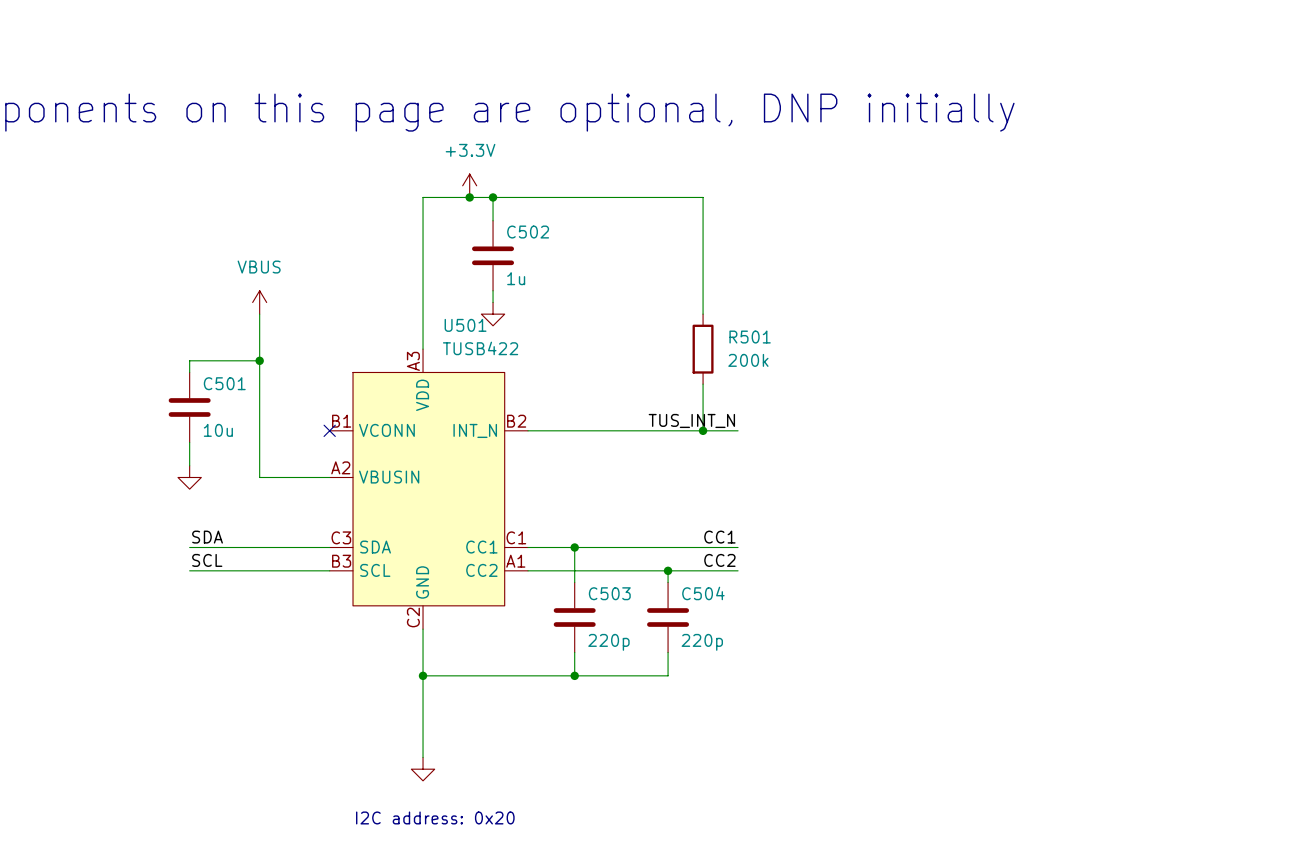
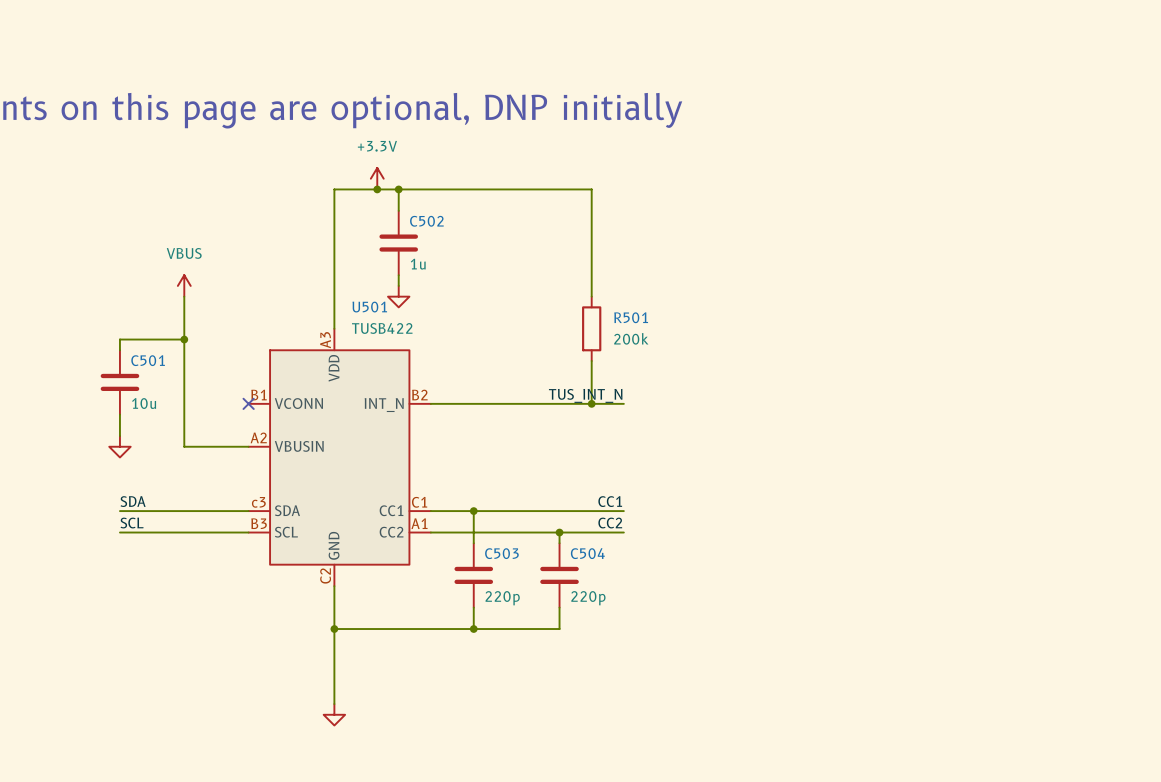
U501 pin number: C3 (341, 537) -> c3 (258, 502)
text: I2C address: 0x20 (435, 817) -> none

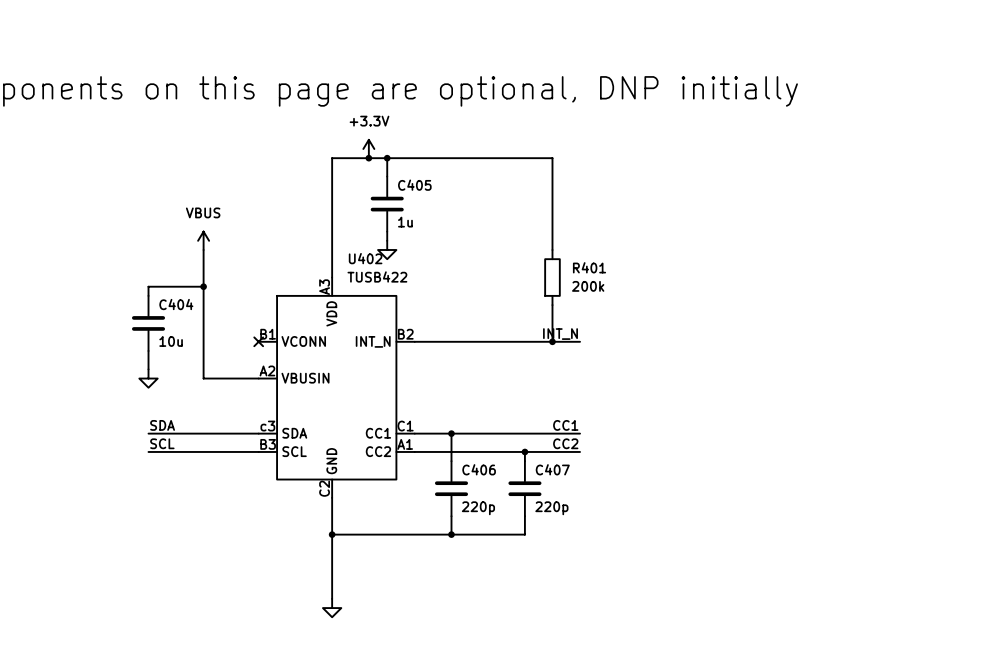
C502 name: C502 (426, 221) -> C405 (414, 185)
U501 name: U501 (369, 307) -> U402 (365, 258)
R501 name: R501 (631, 317) -> R401 (589, 267)
C501 name: C501 (148, 360) -> C404 (176, 304)
label: TUS_INT_N (585, 395) -> INT_N (560, 334)
C503 name: C503 (501, 553) -> C406 (479, 469)
C504 name: C504 (587, 553) -> C407 (552, 469)

